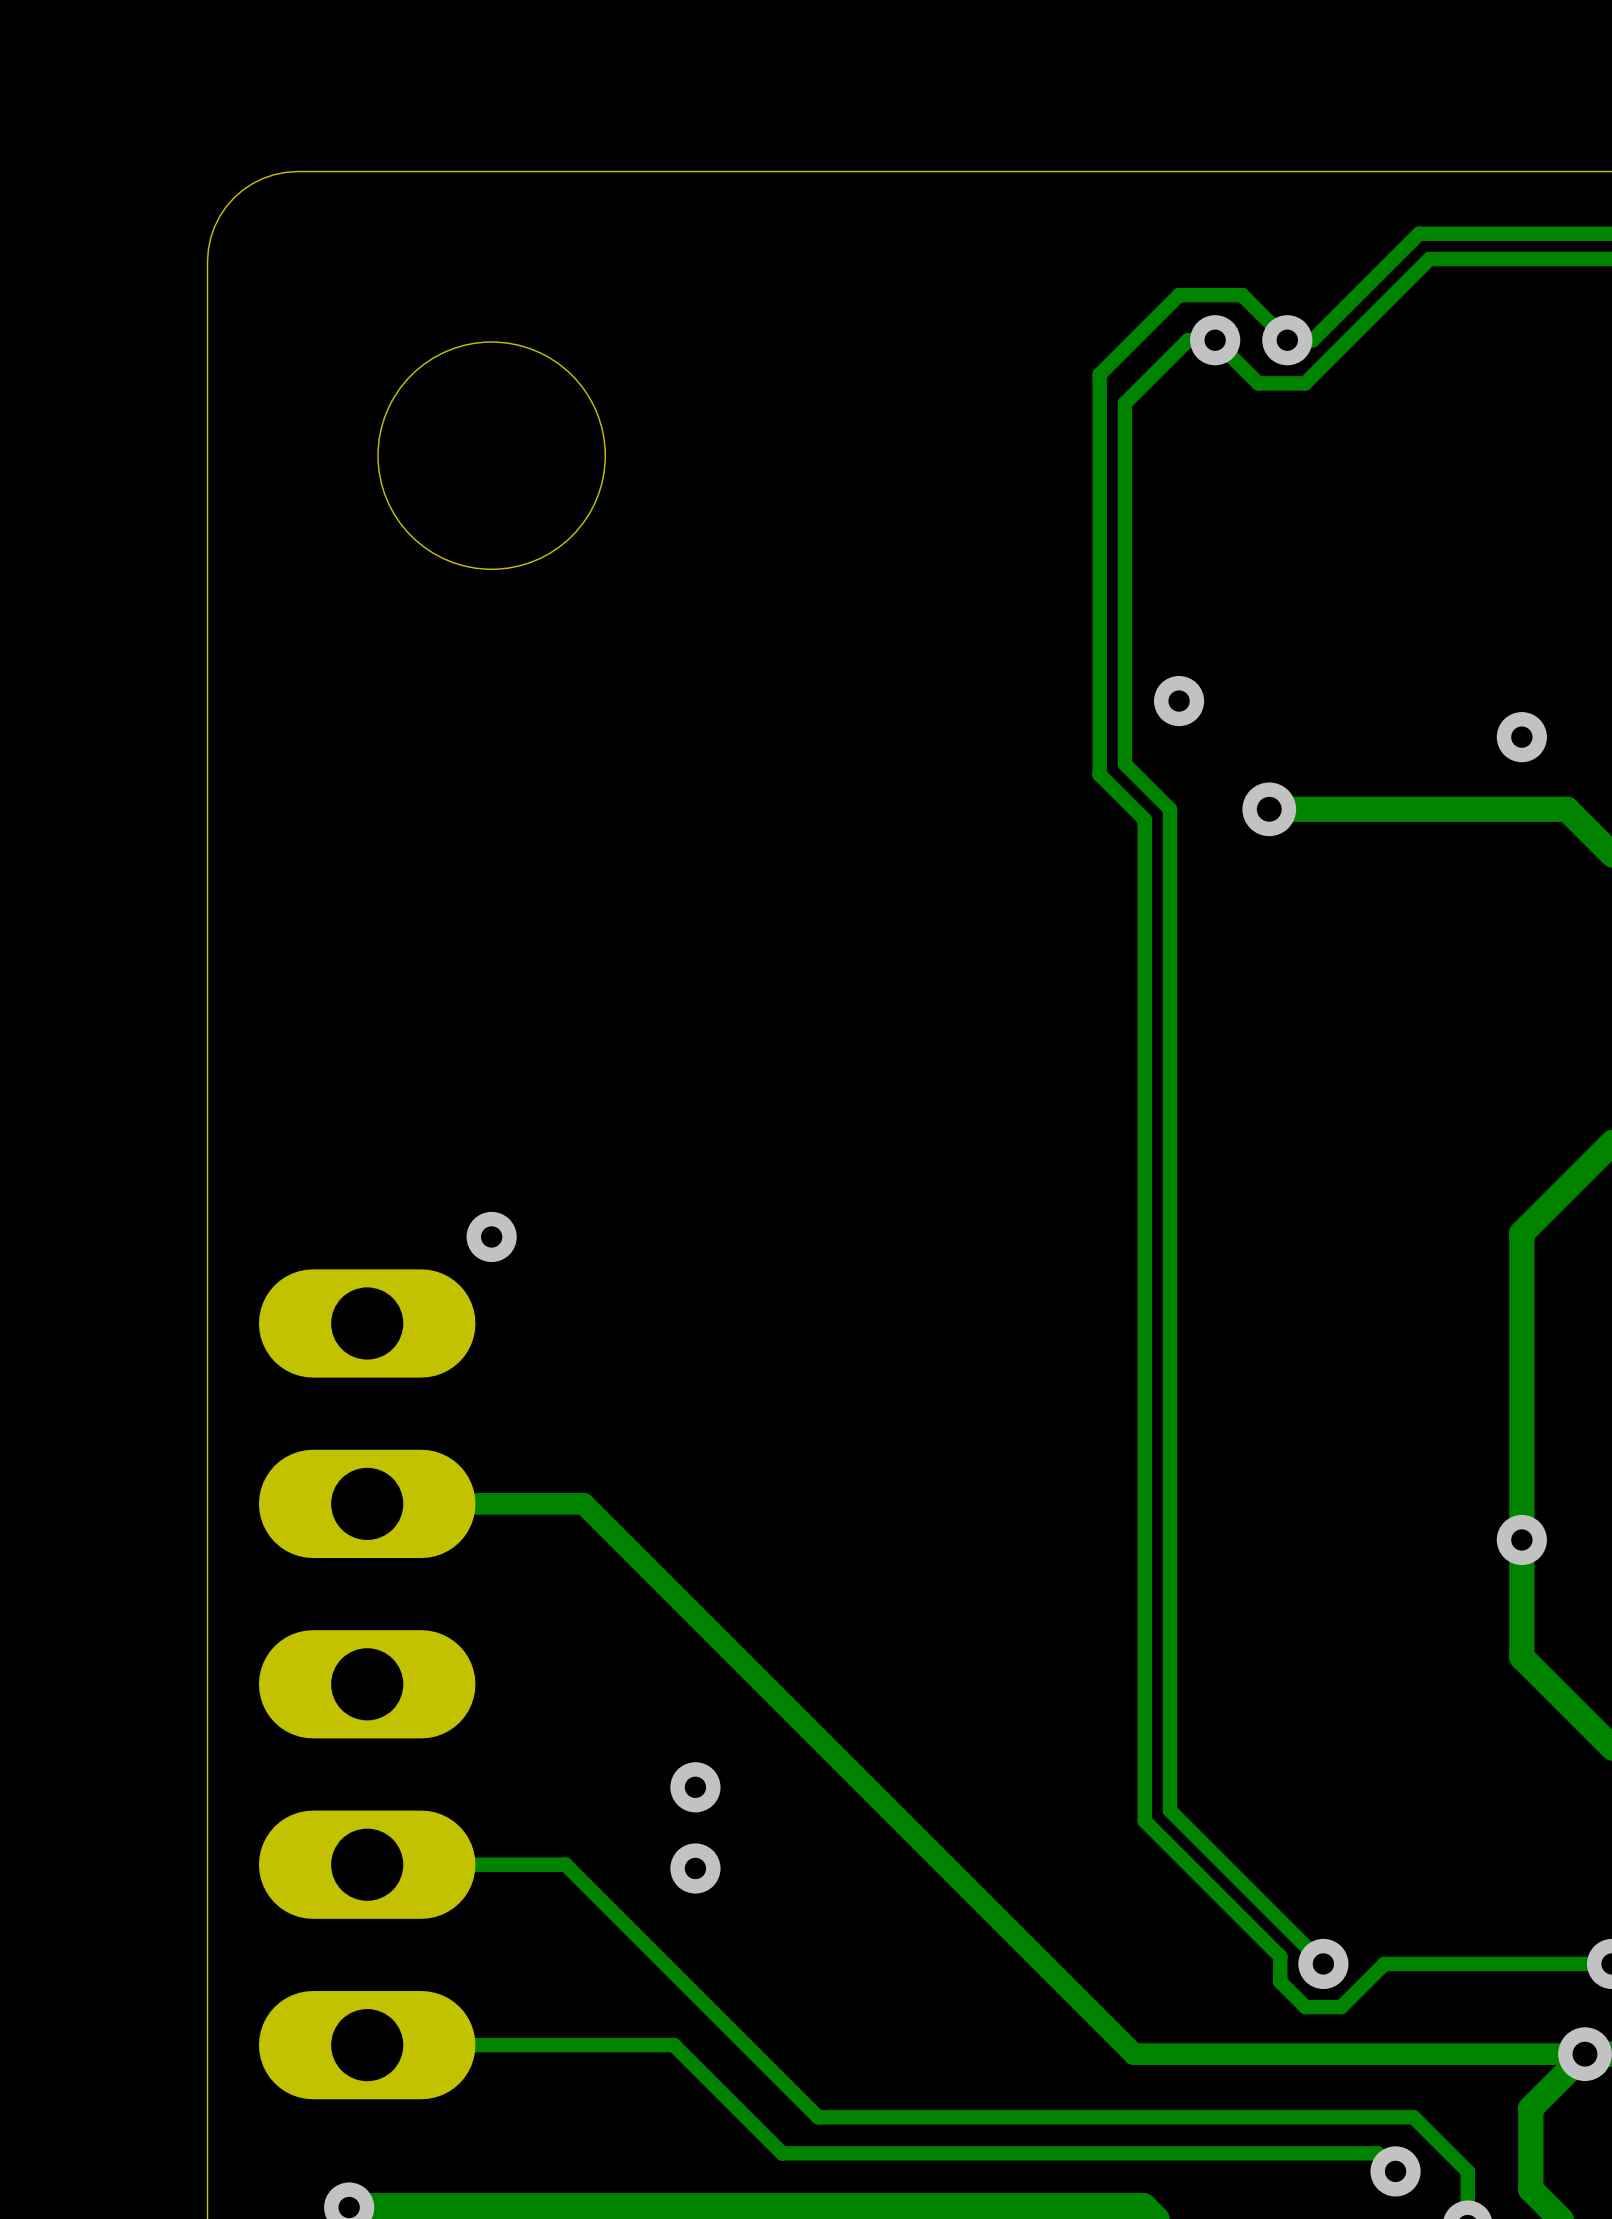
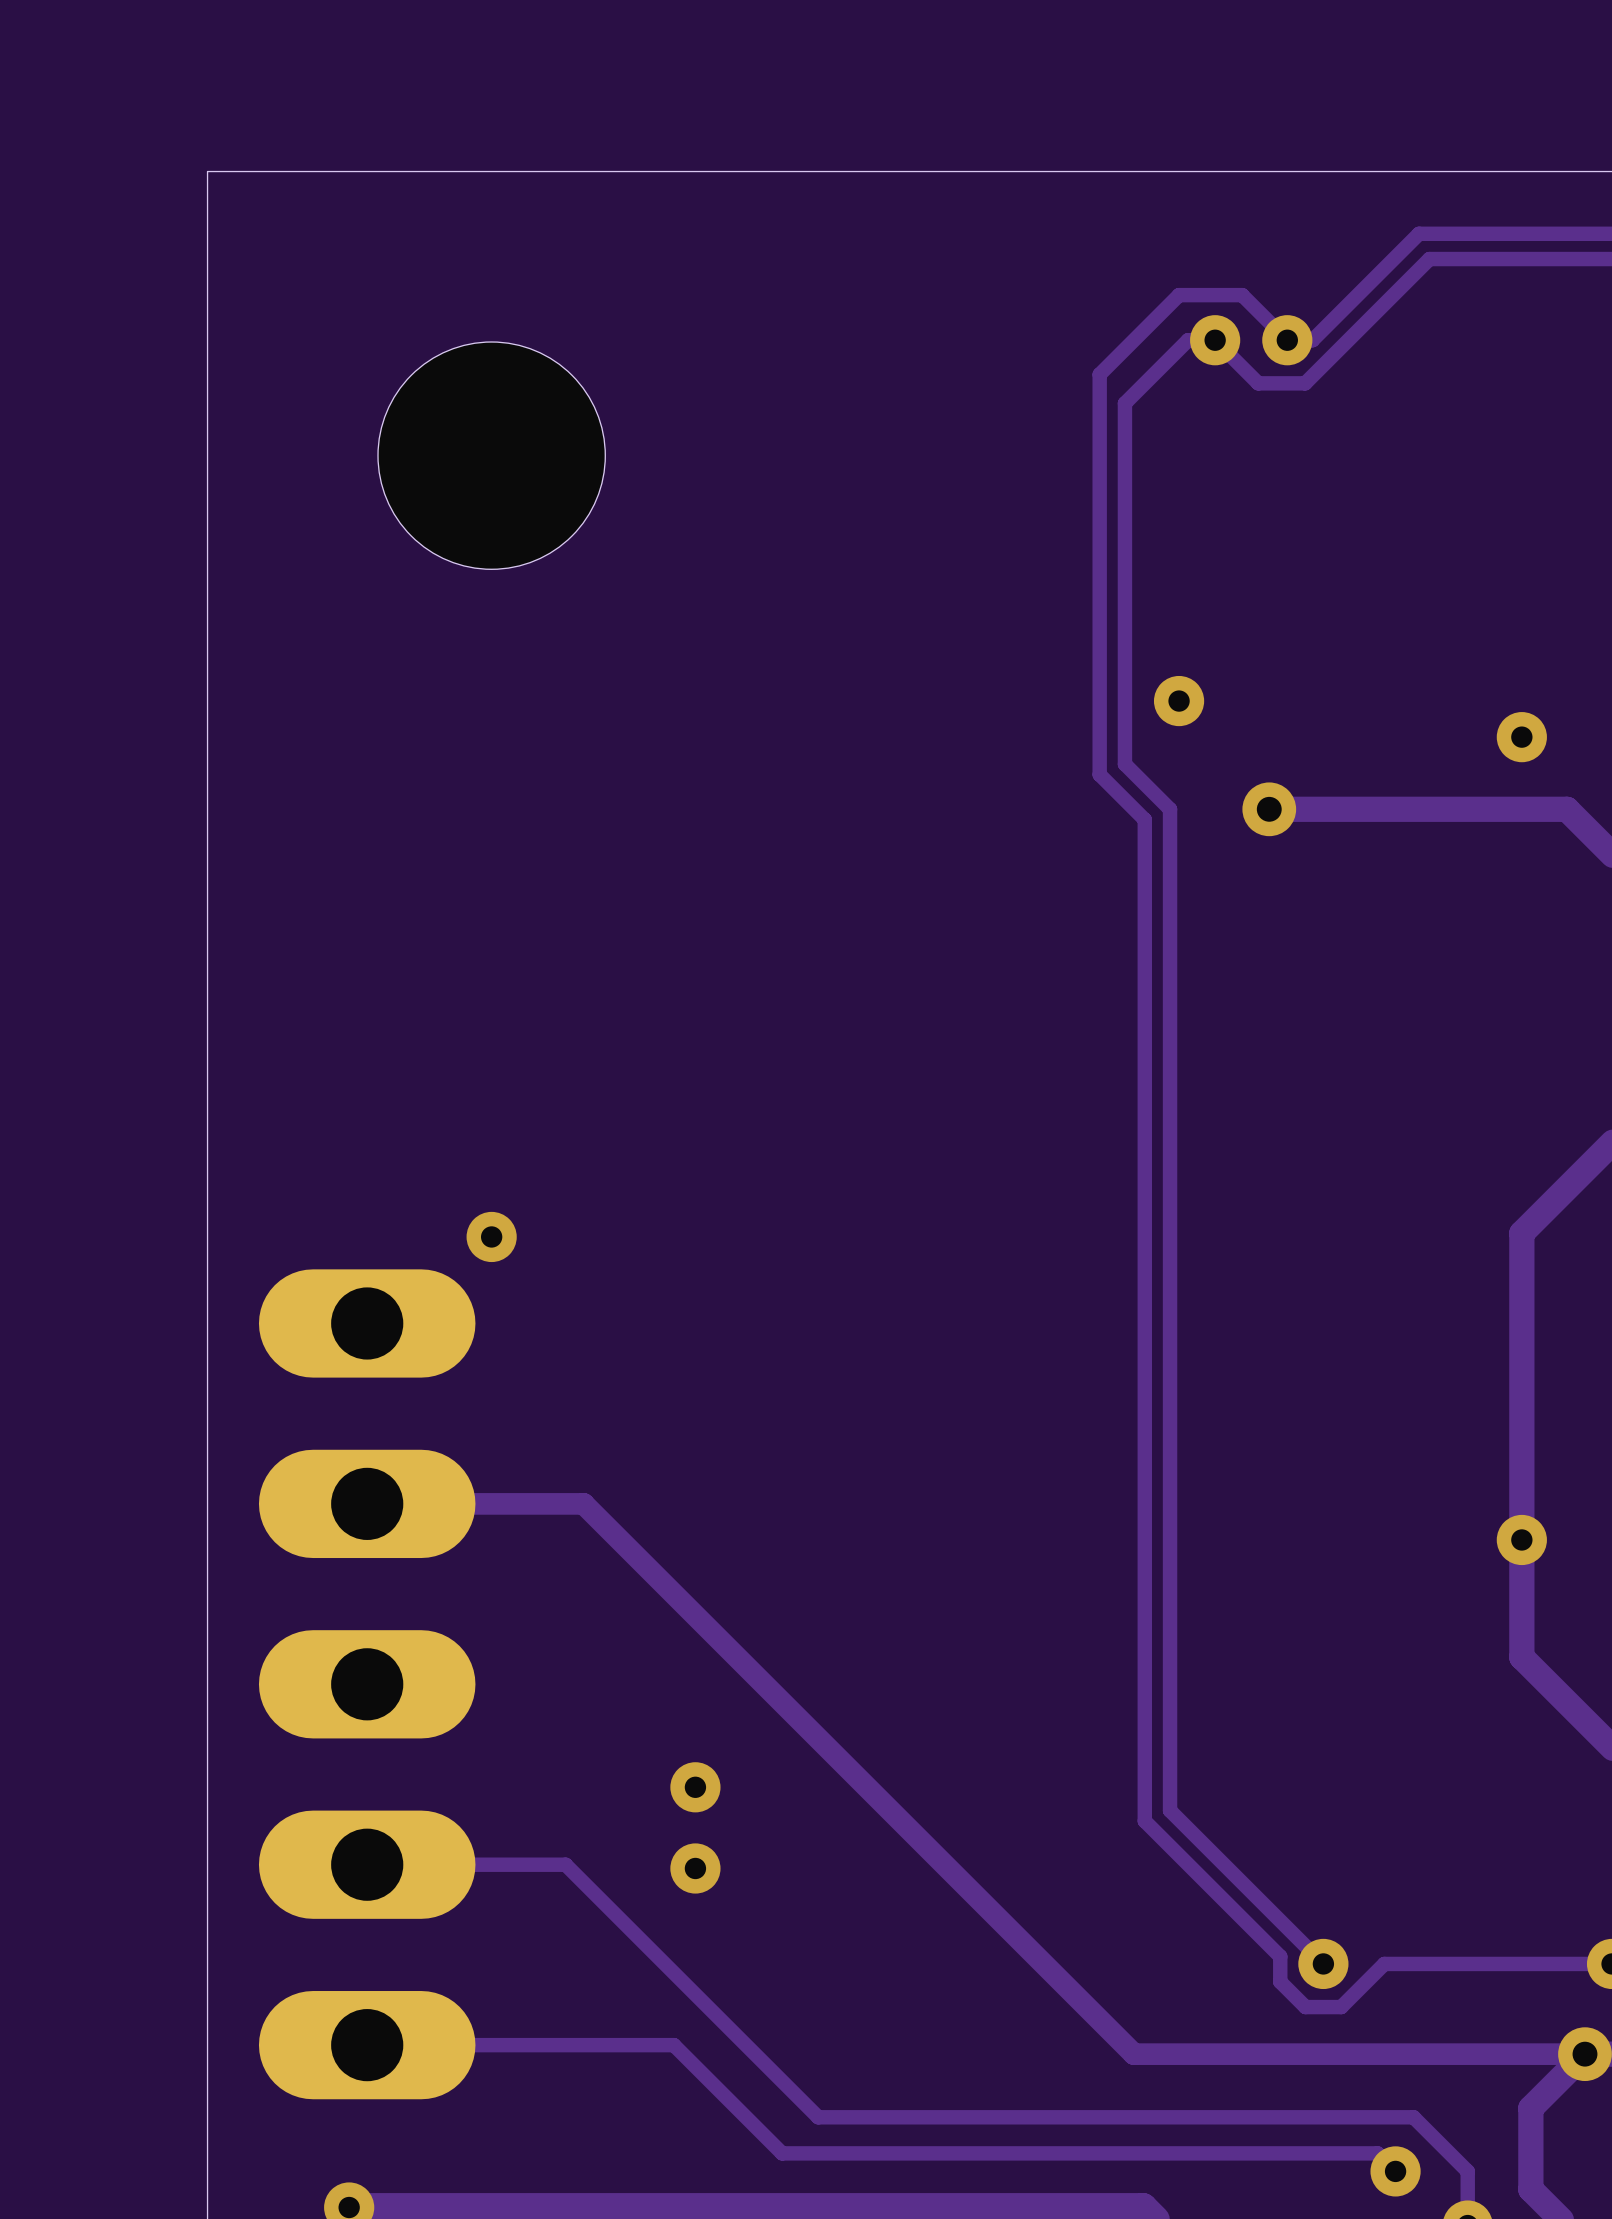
board edge: (297, 171) (274, 174) (263, 178) (252, 183) (233, 197) (219, 216) (214, 227) (210, 238) (207, 261) -> (297, 171) (207, 171) (207, 261)

